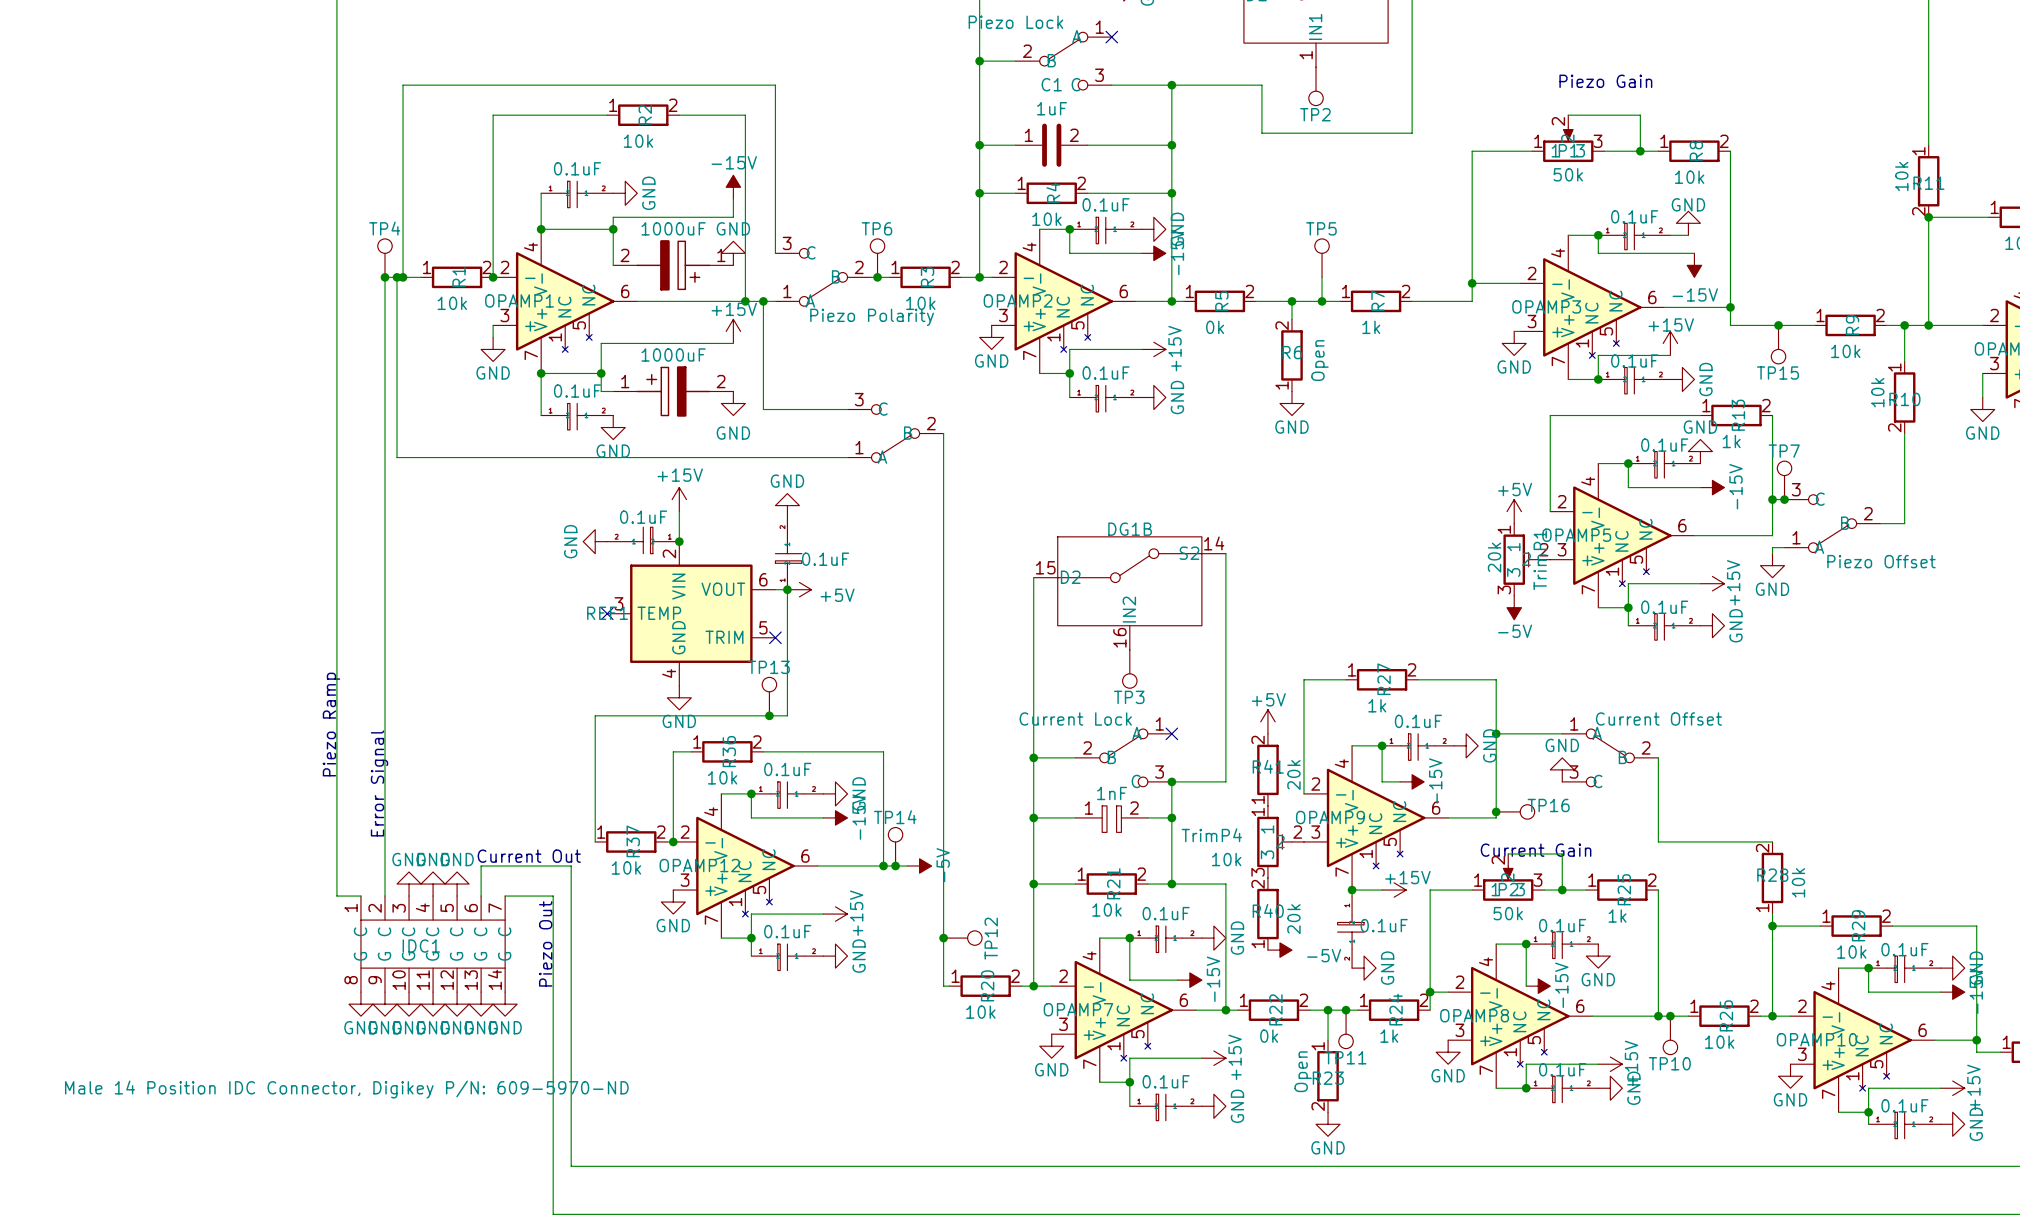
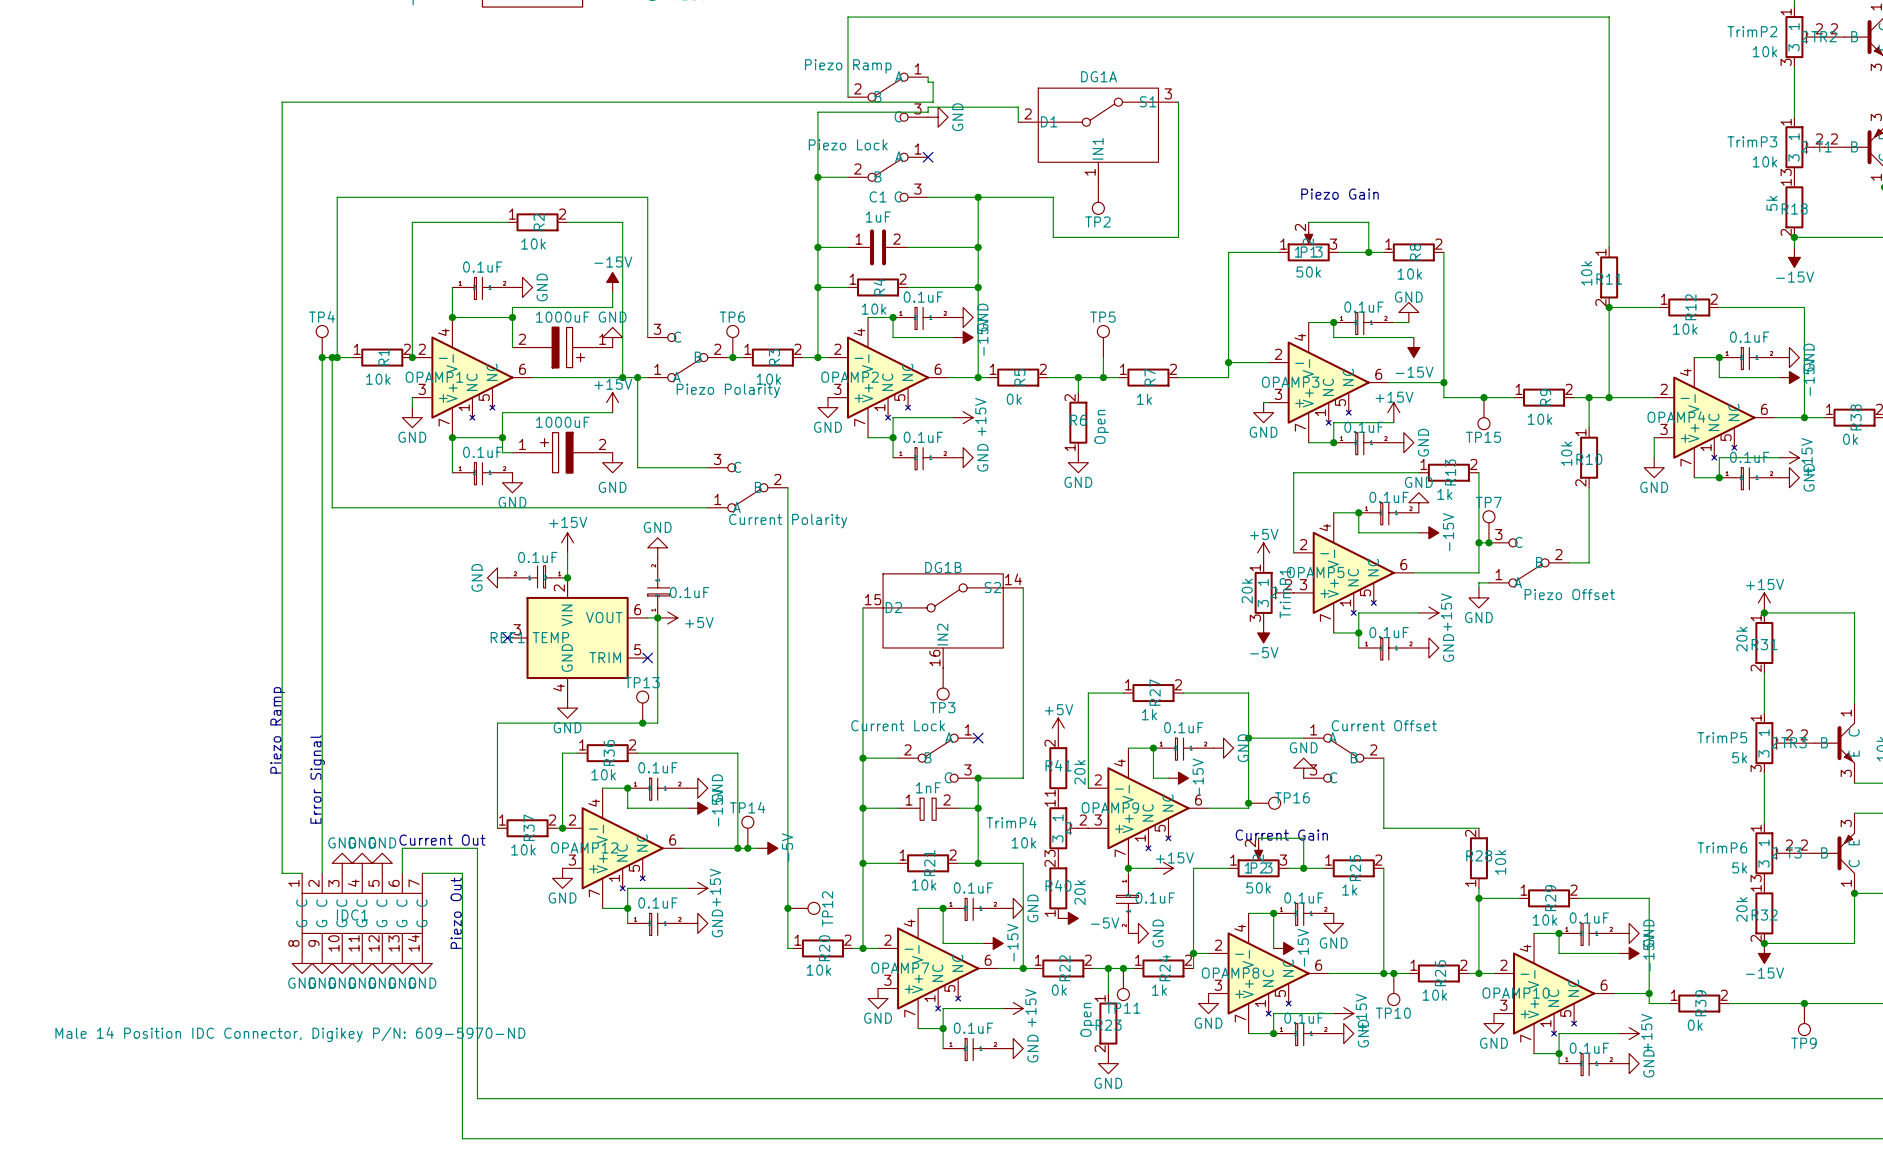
part text: none -> Current Polarity (788, 521)

